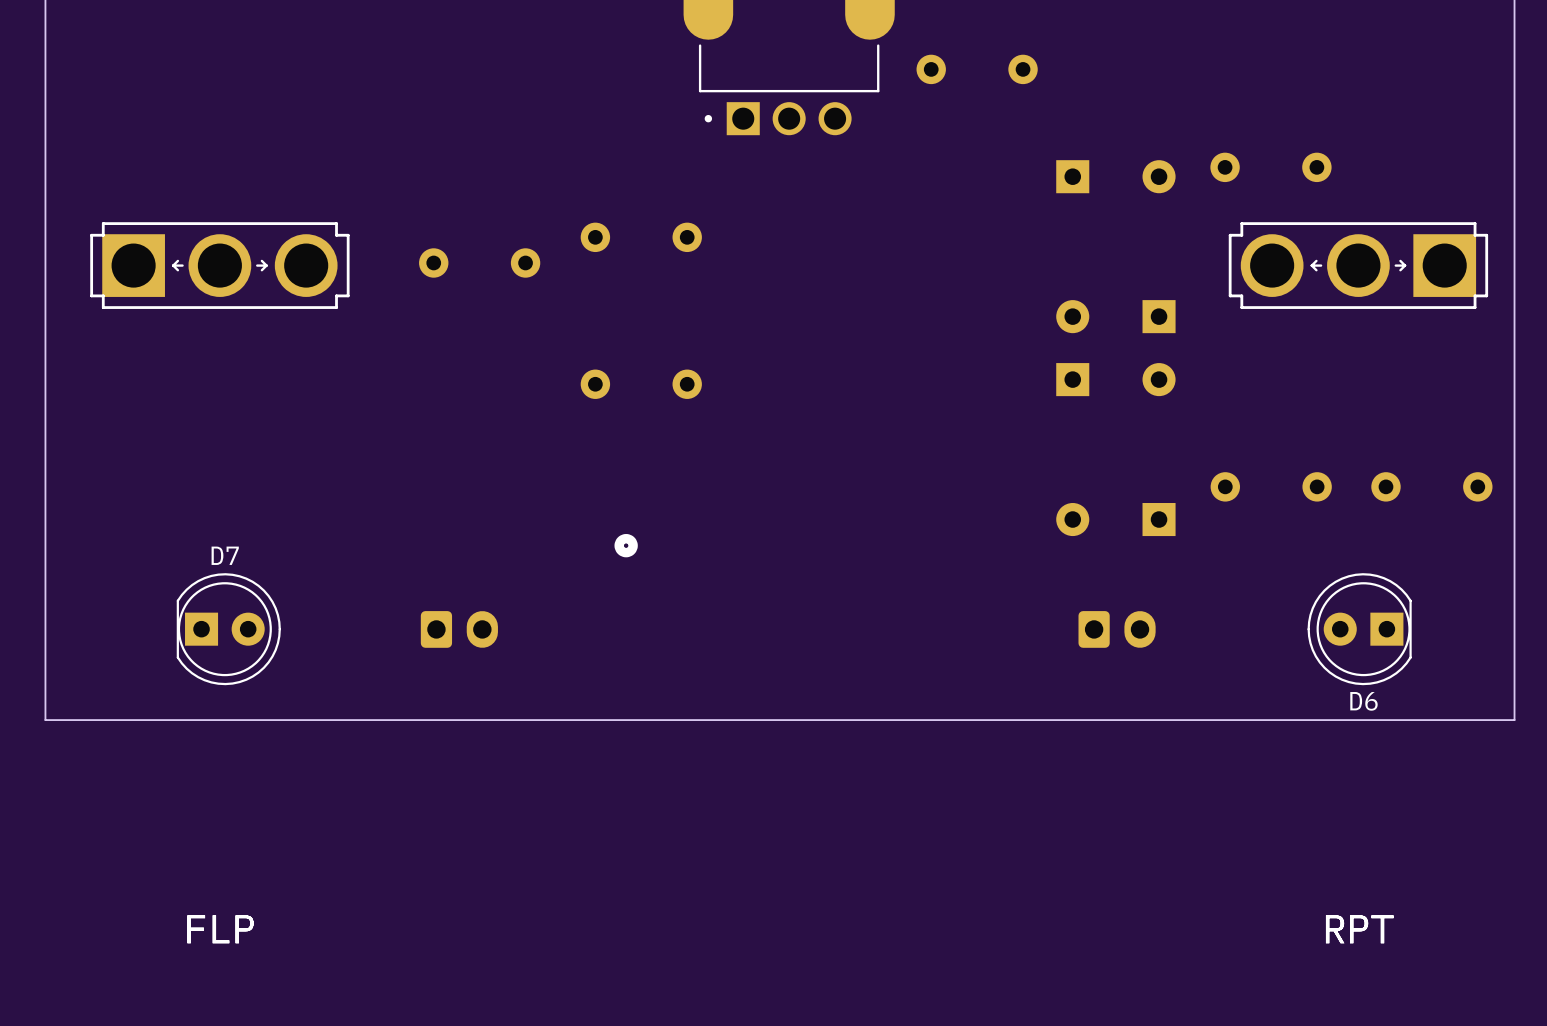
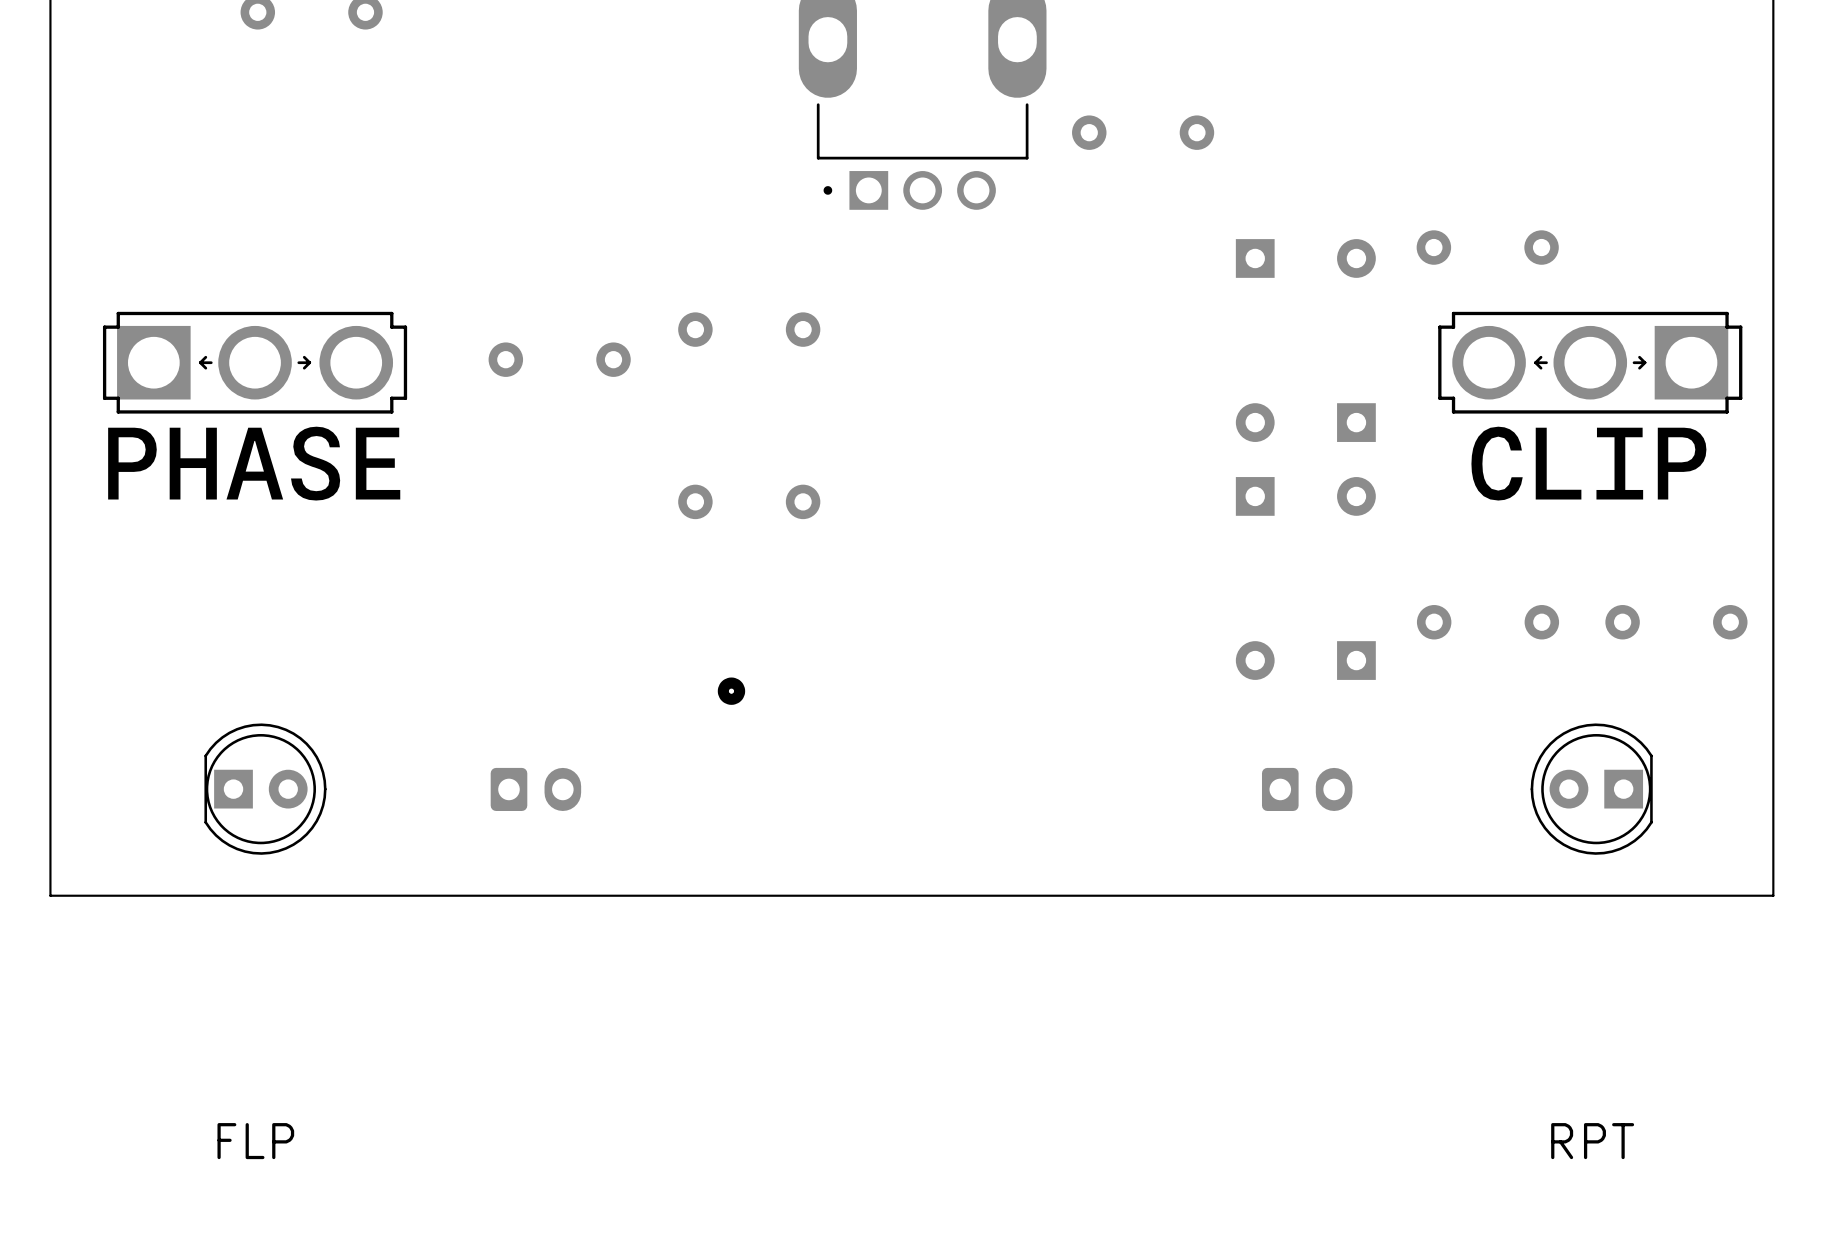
drawing: none -> [108, 426, 401, 501]
drawing: none -> [1471, 426, 1707, 501]
D7 name: D7 (225, 555) -> none
D6 name: D6 (1363, 701) -> none
drawing: none -> [217, 1123, 295, 1160]
drawing: none -> [1551, 1123, 1635, 1160]
FLP: FLP (220, 929) -> none
RPT: RPT (1359, 929) -> none

